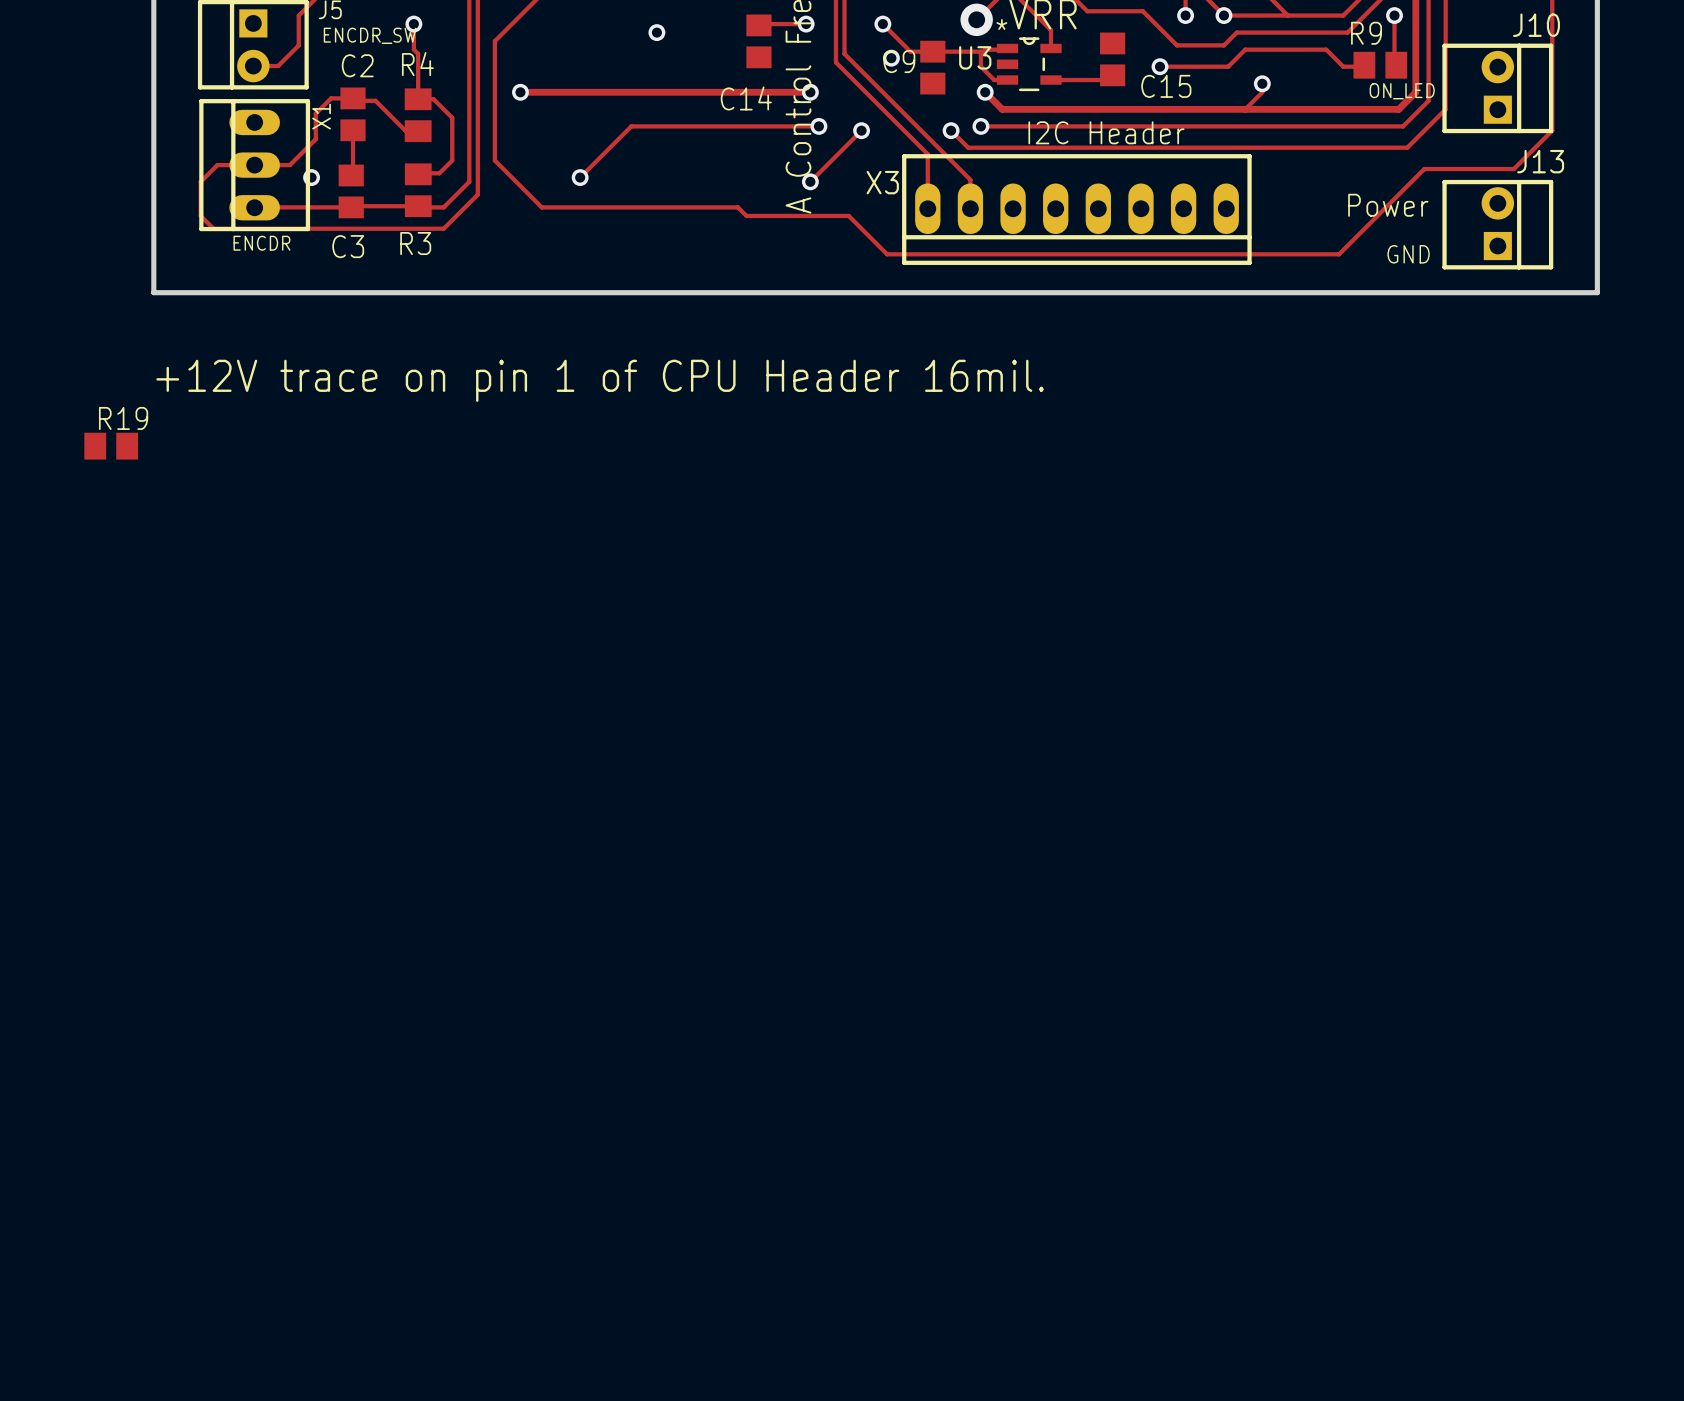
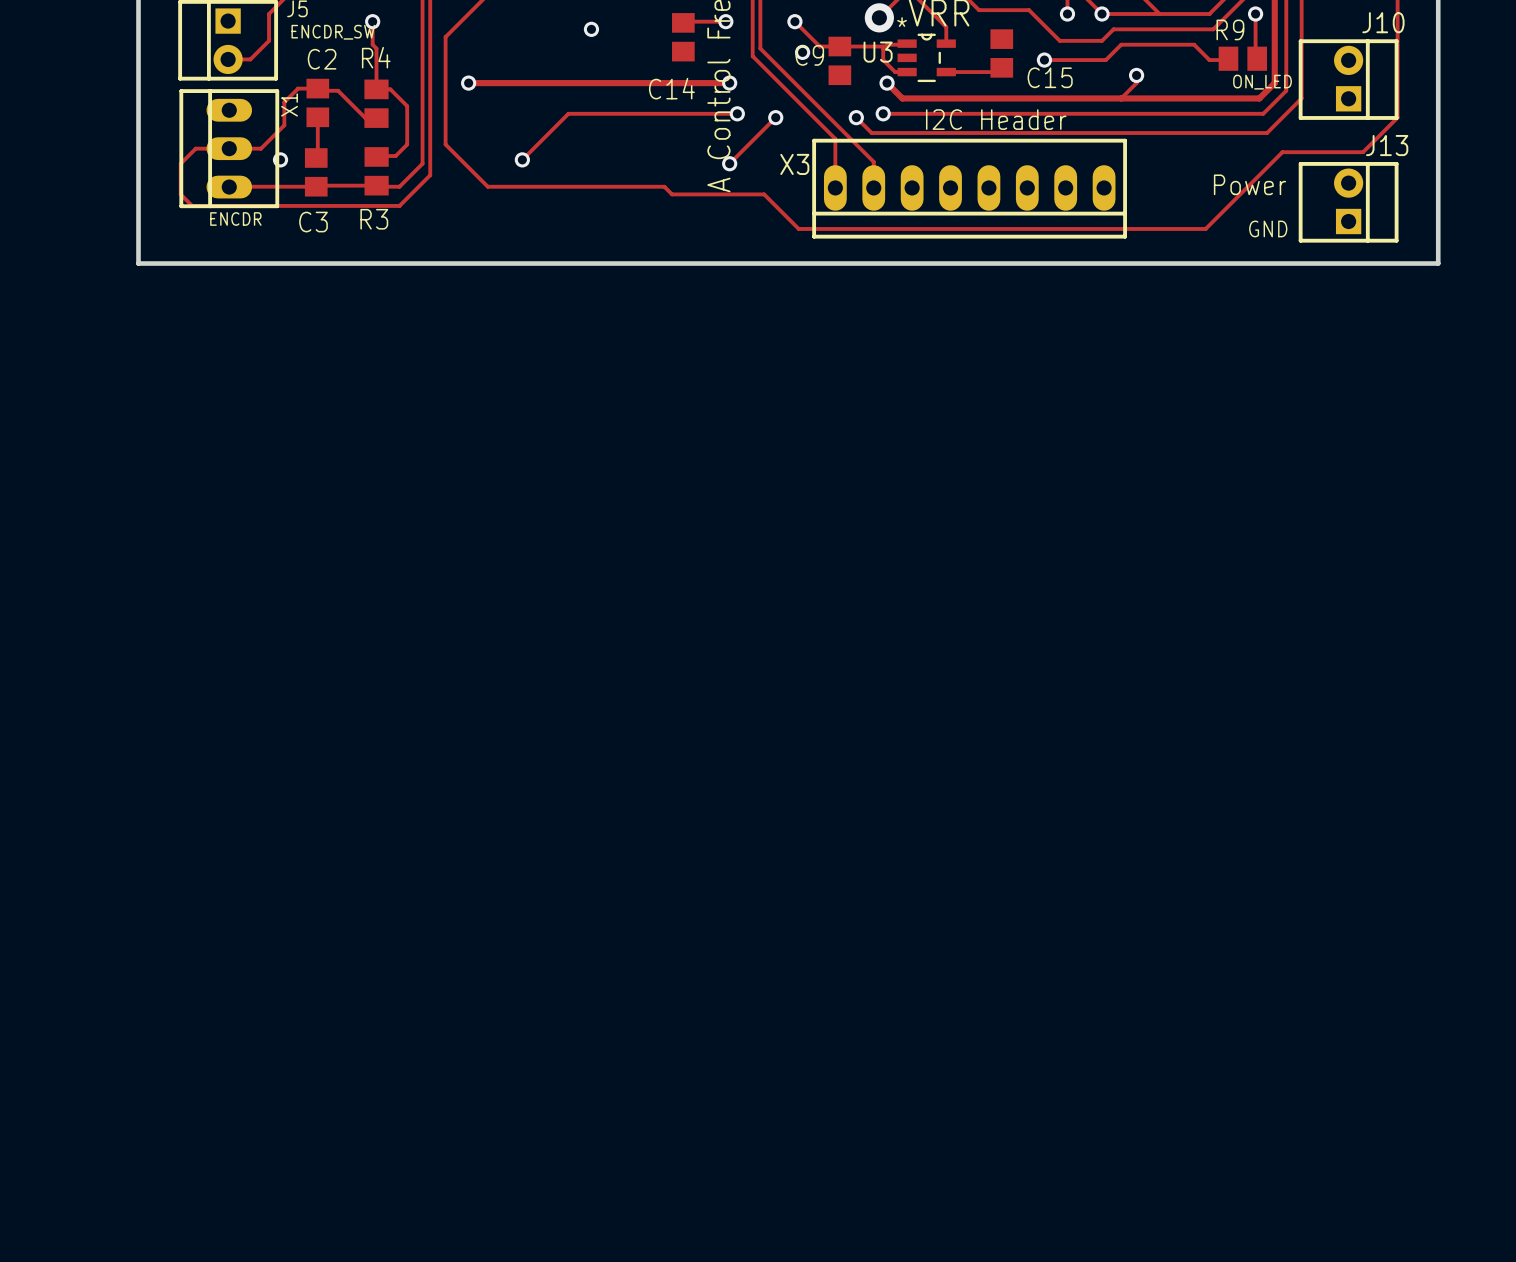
text: +12V trace on pin 1 of CPU Header 16mil. (600, 380) -> none
R19: (111, 446) -> none

